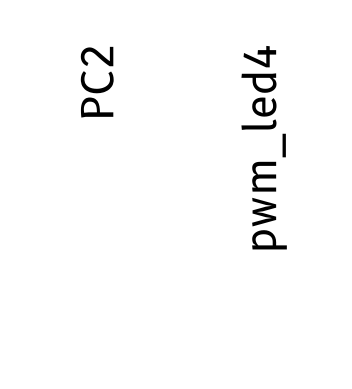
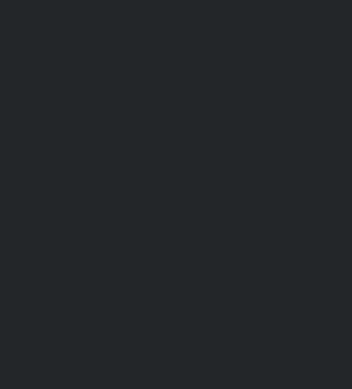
label: PC2 (97, 82) -> none
label: pwm_led4 (264, 147) -> none

